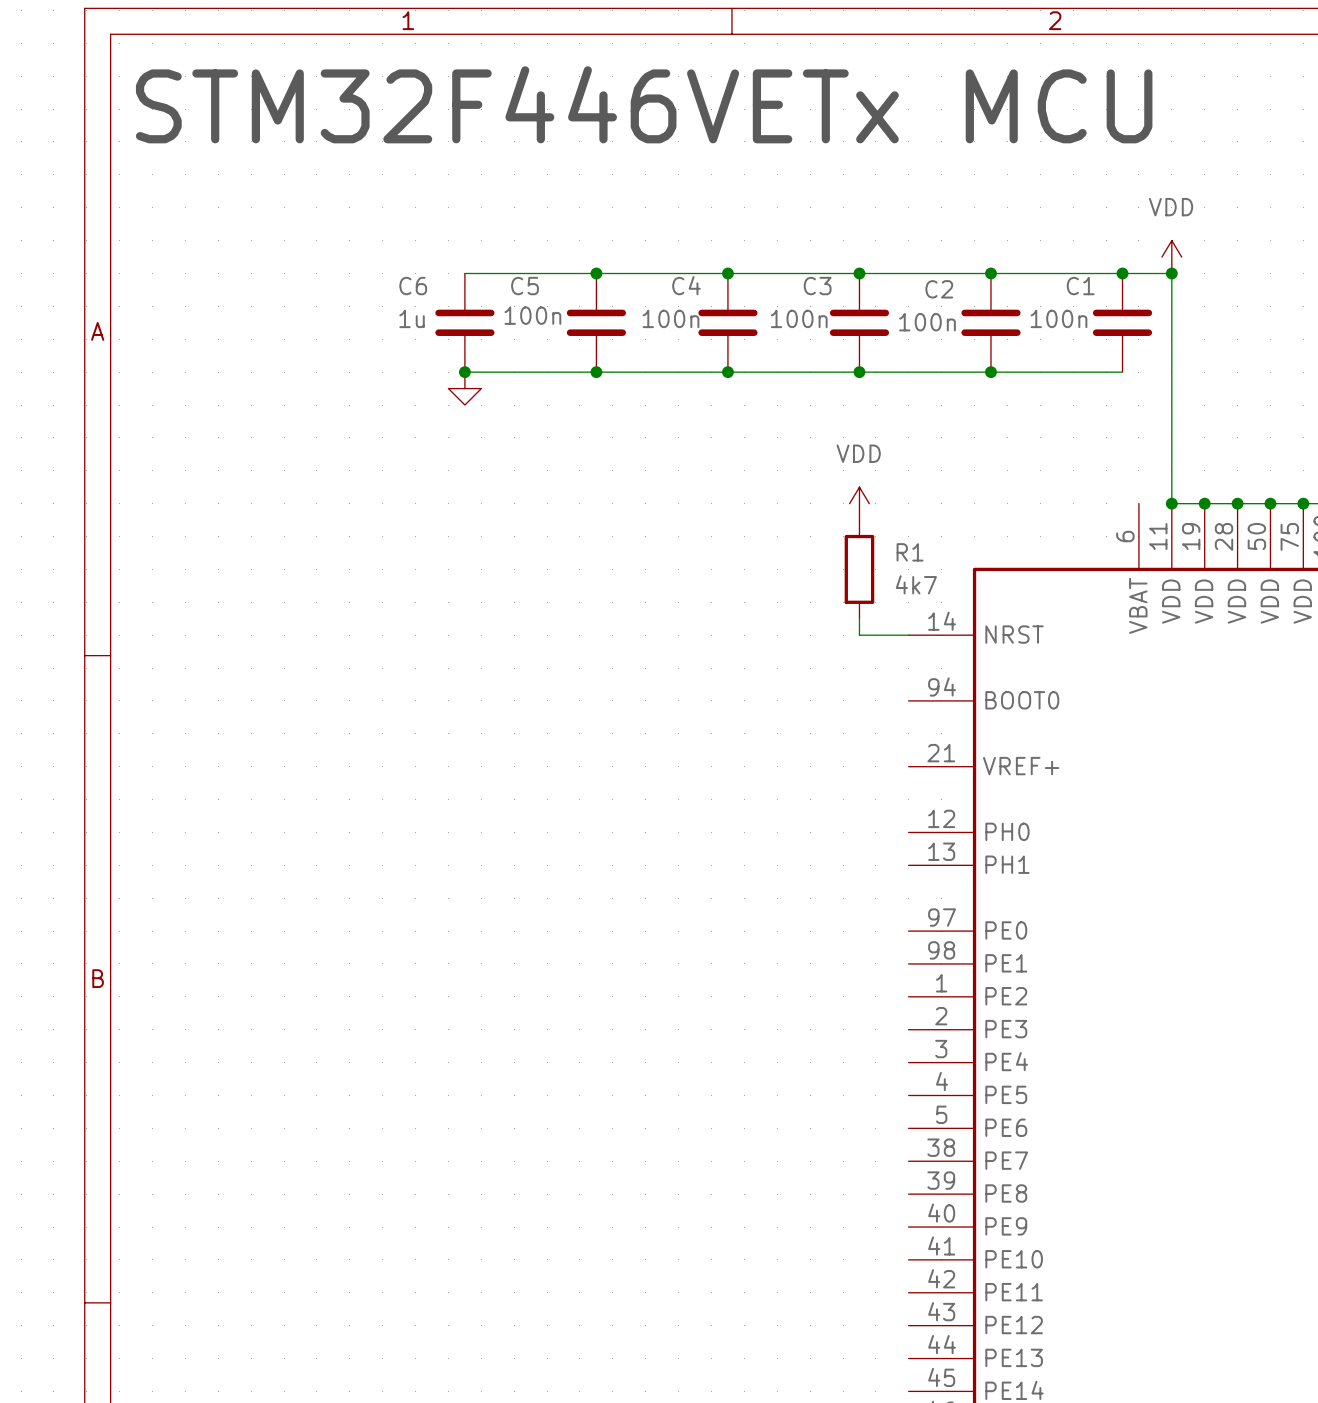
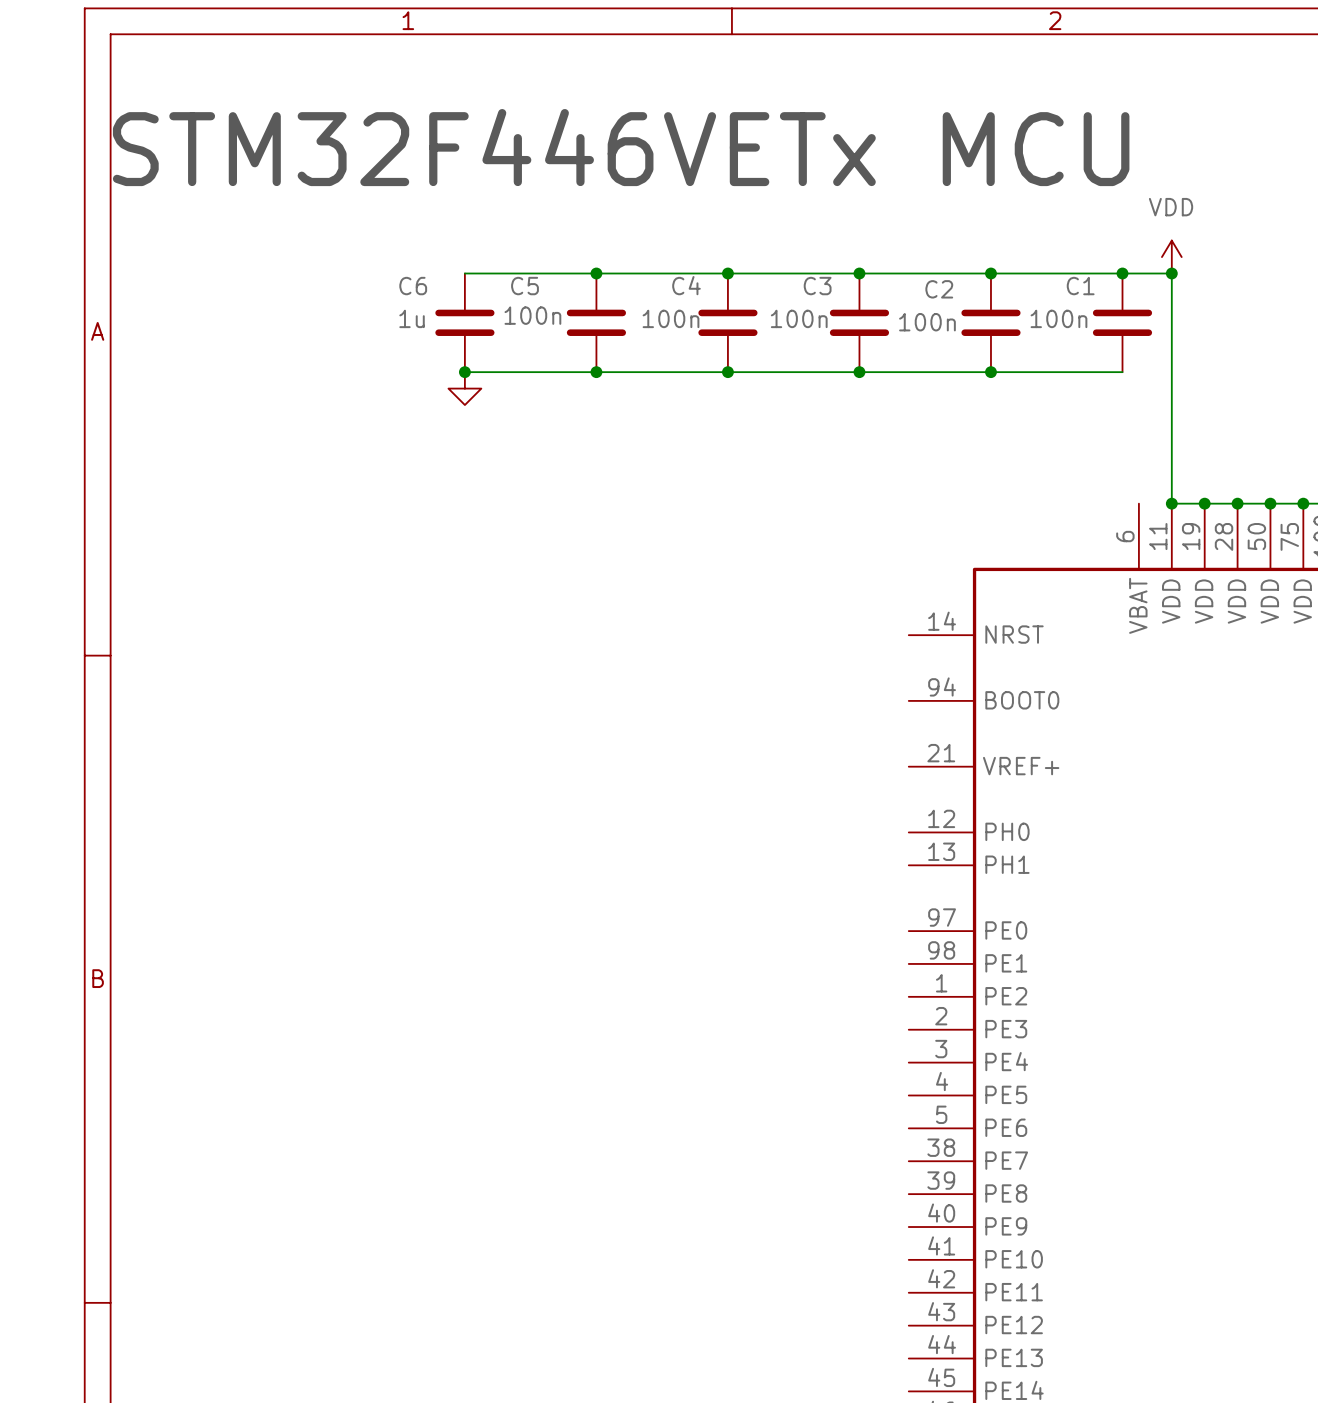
text position: STM32F446VETx MCU (644, 104) -> STM32F446VETx MCU (621, 147)
power symbol: VDD (859, 503) -> none
R1: 4k7 (859, 569) -> none
wire: (859, 618) (859, 635) (908, 635) -> none

